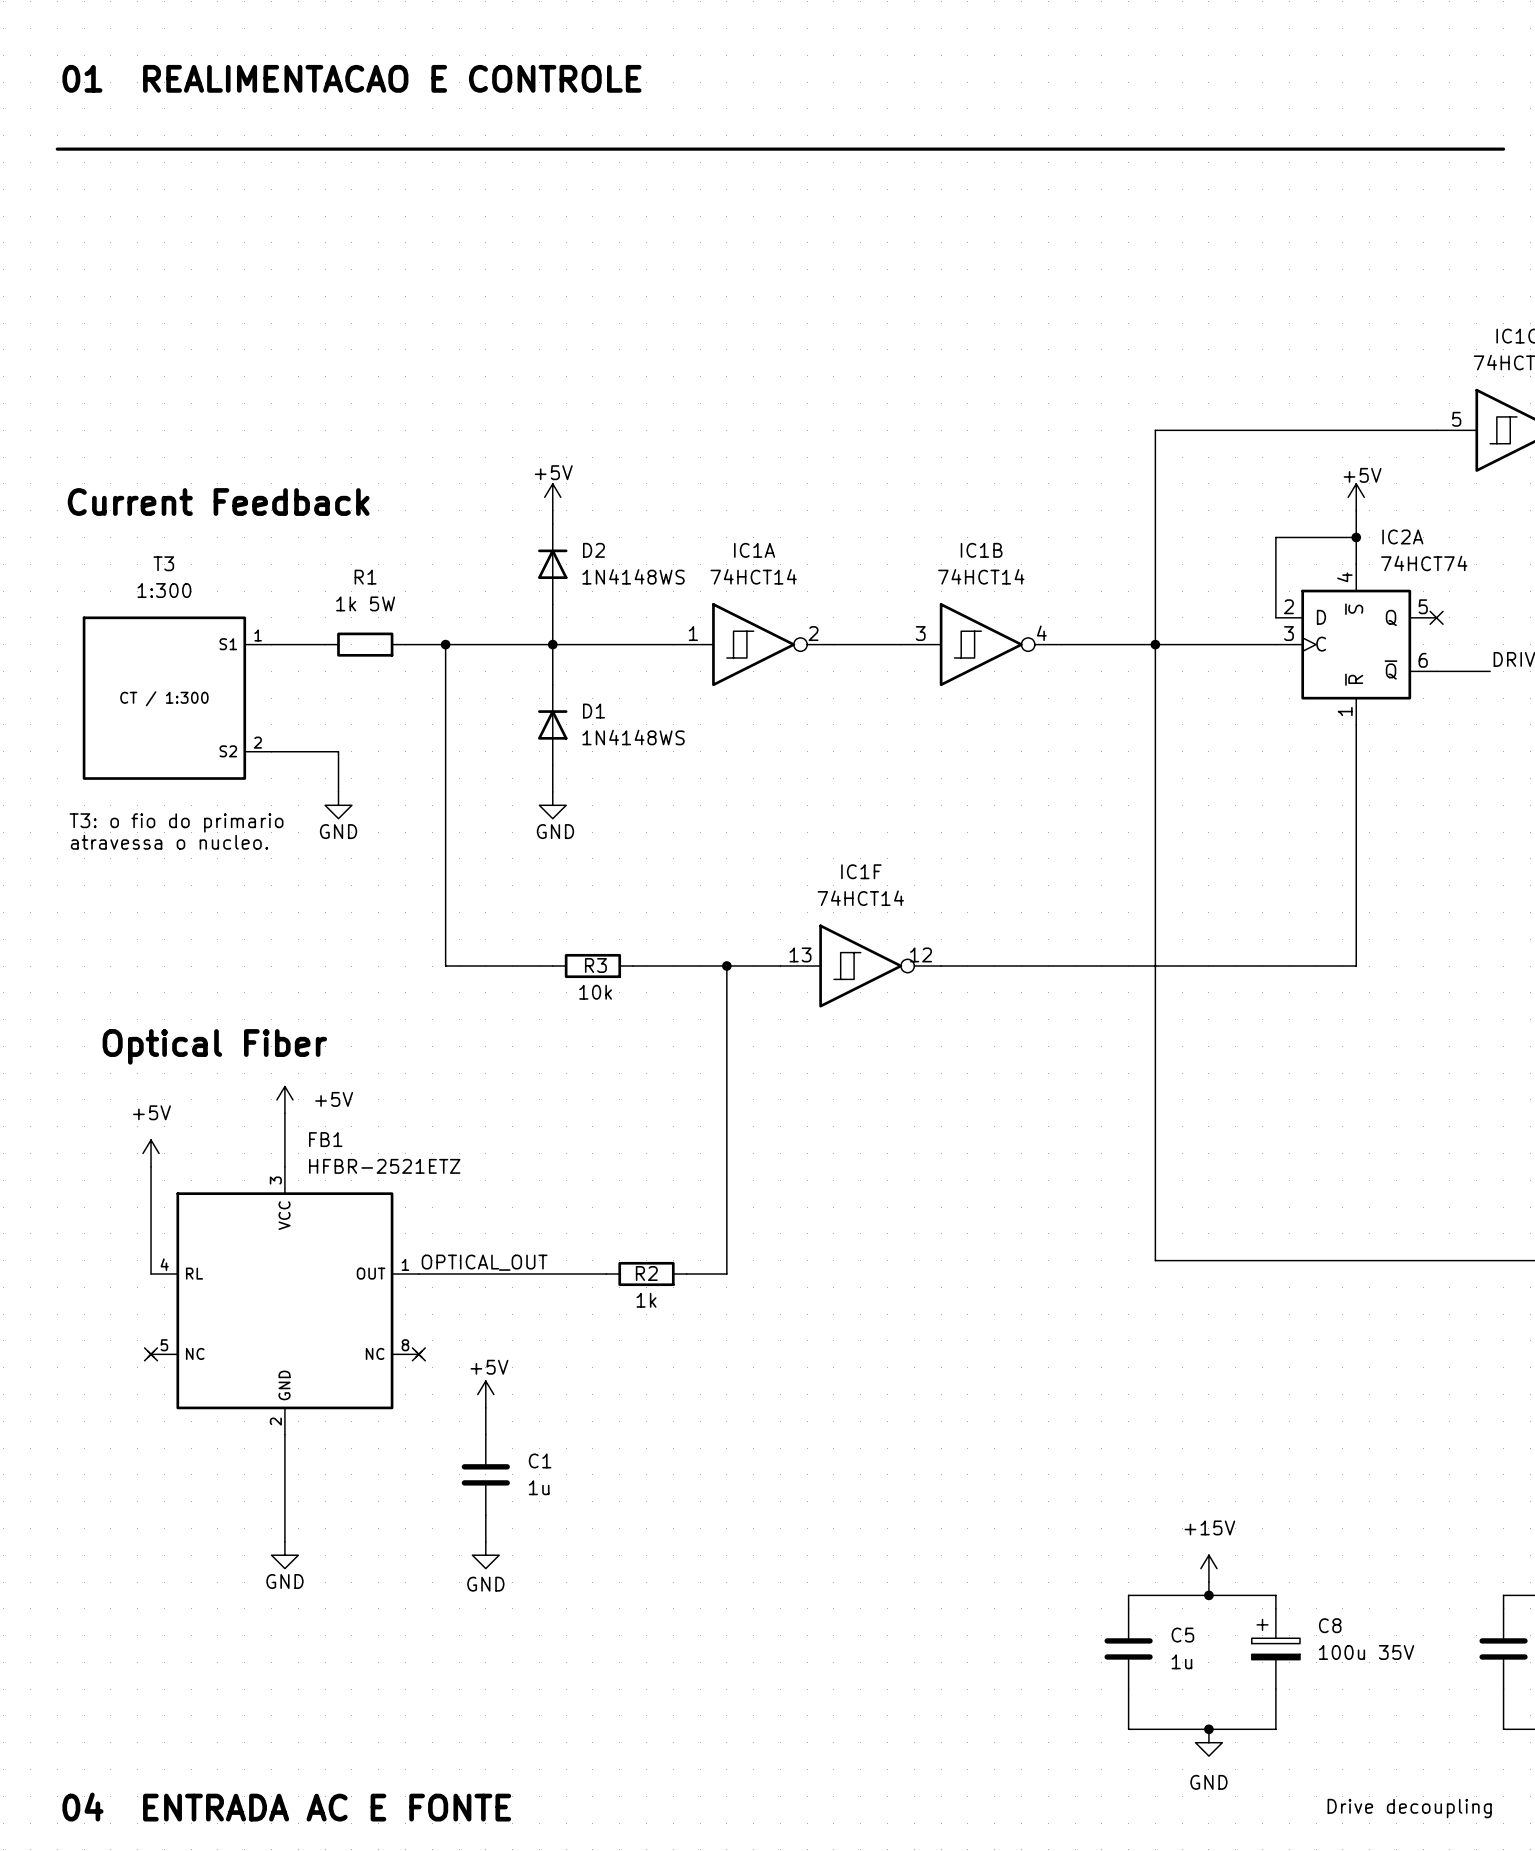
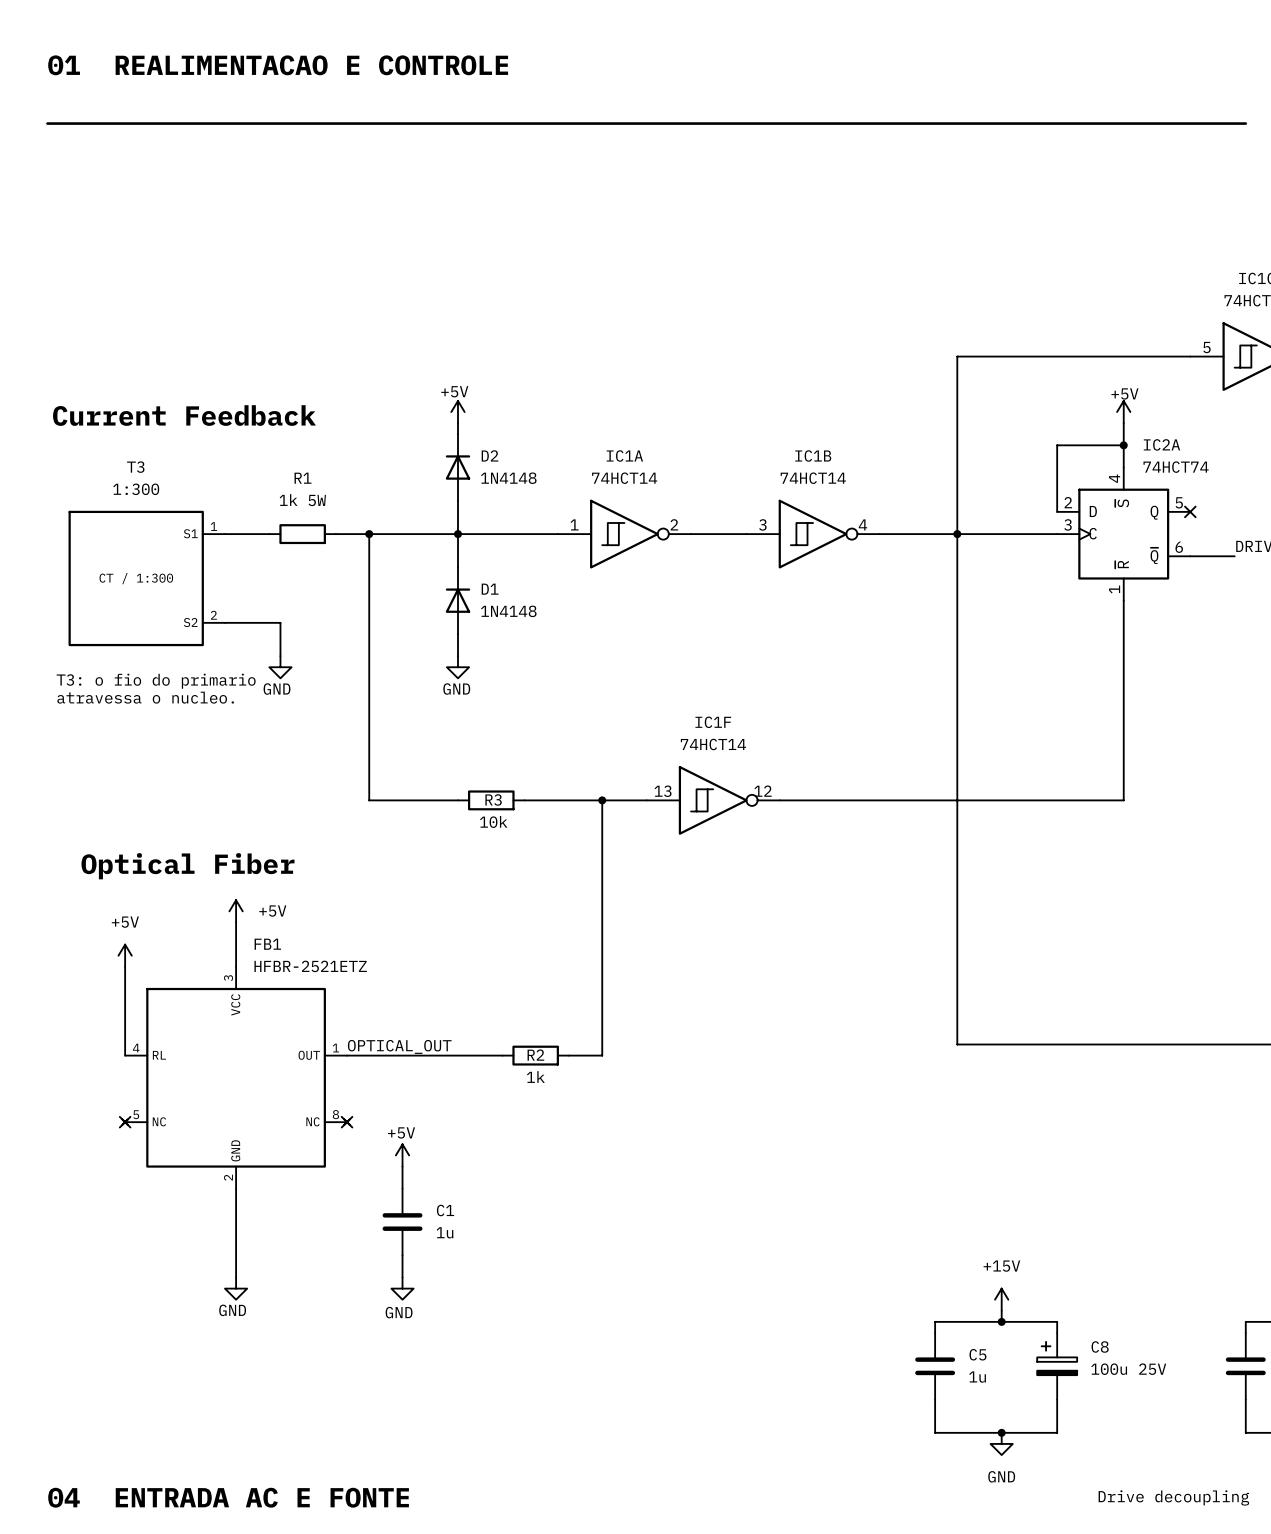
D2 value: 1N4148WS (633, 576) -> 1N4148 (508, 478)
D1 value: 1N4148WS (633, 737) -> 1N4148 (508, 611)
C8 value: 100u 35V (1366, 1652) -> 100u 25V (1128, 1369)

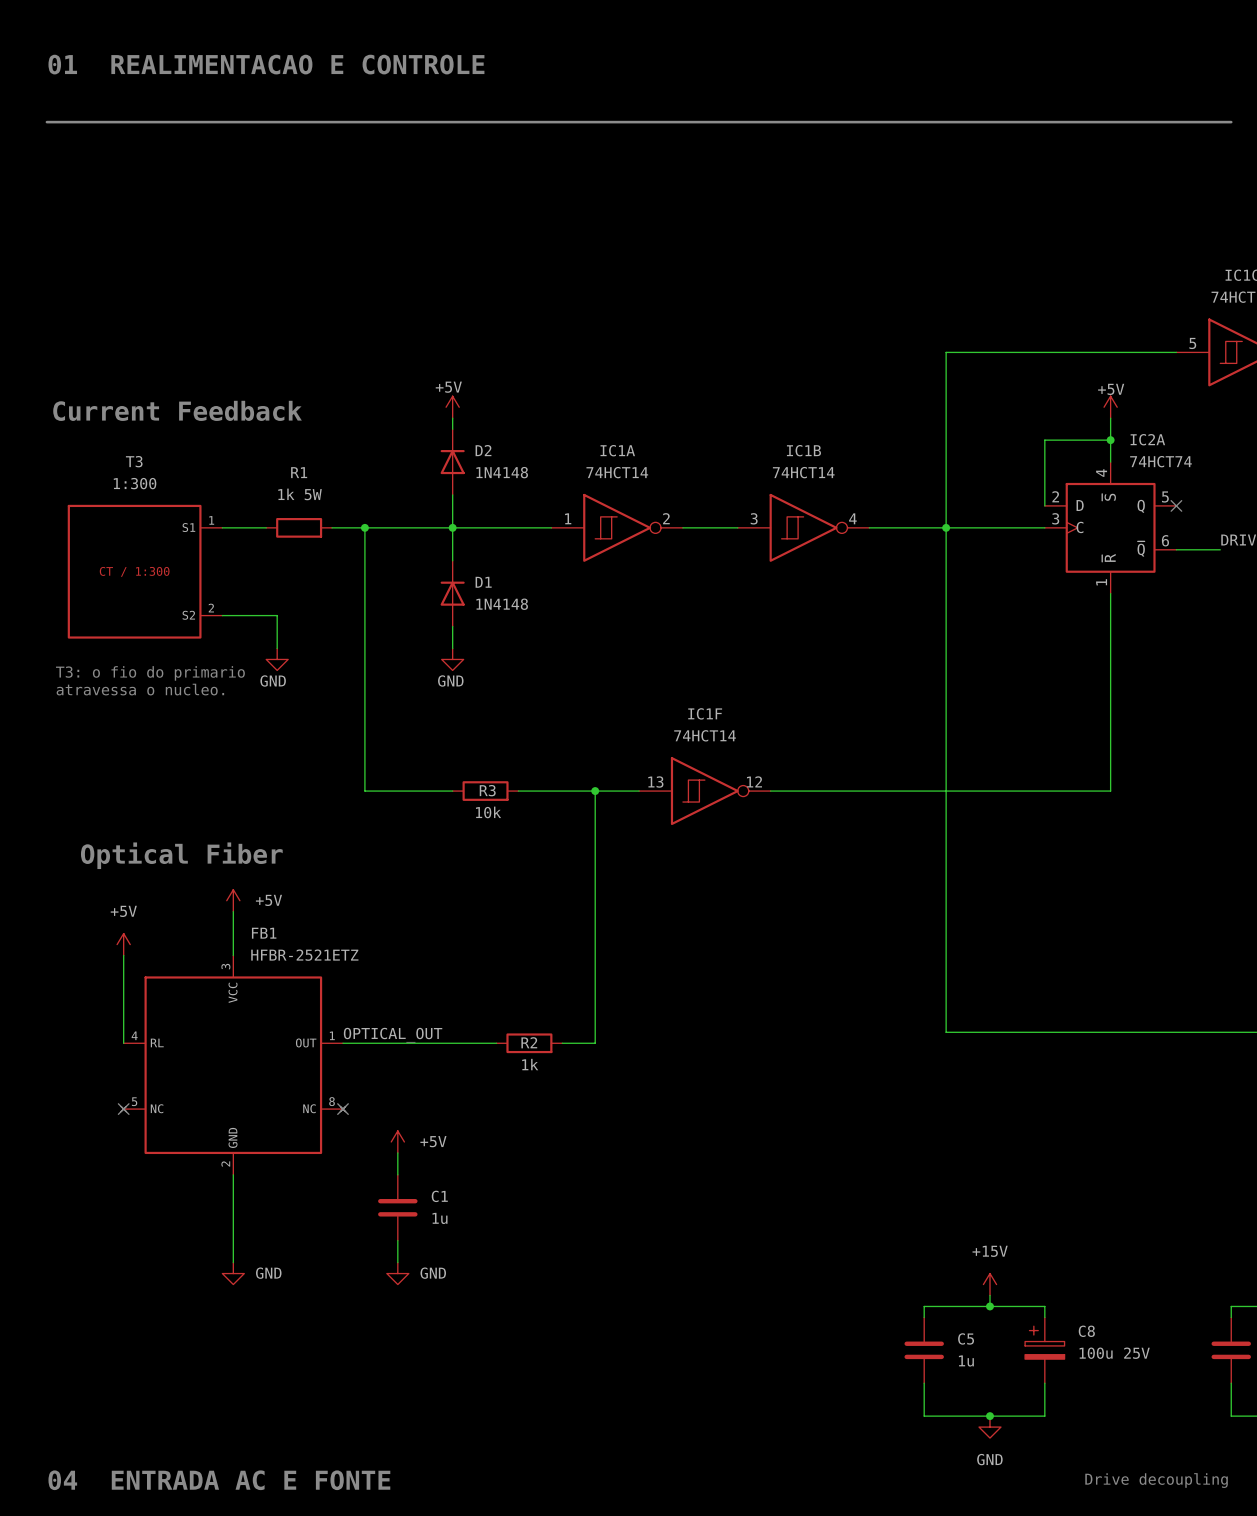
power symbol text position: +5V (401, 1132) -> +5V (433, 1141)
power symbol text position: GND (232, 1310) -> GND (268, 1273)
power symbol text position: GND (399, 1312) -> GND (433, 1273)

